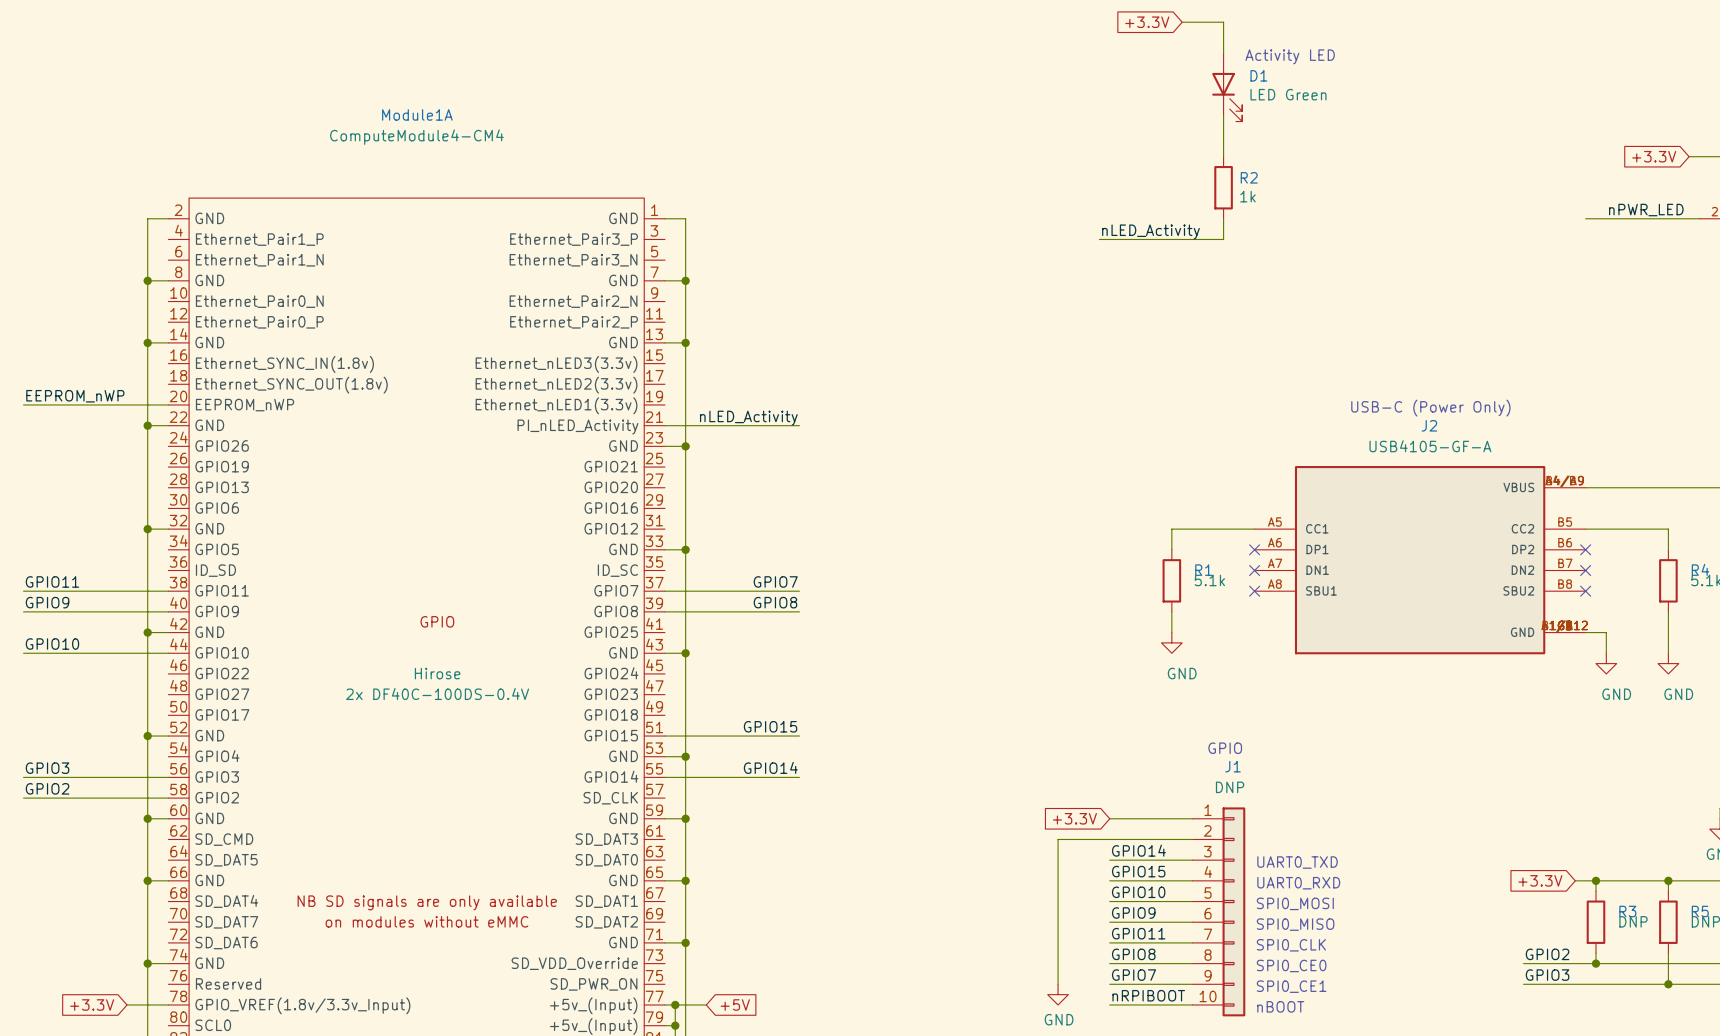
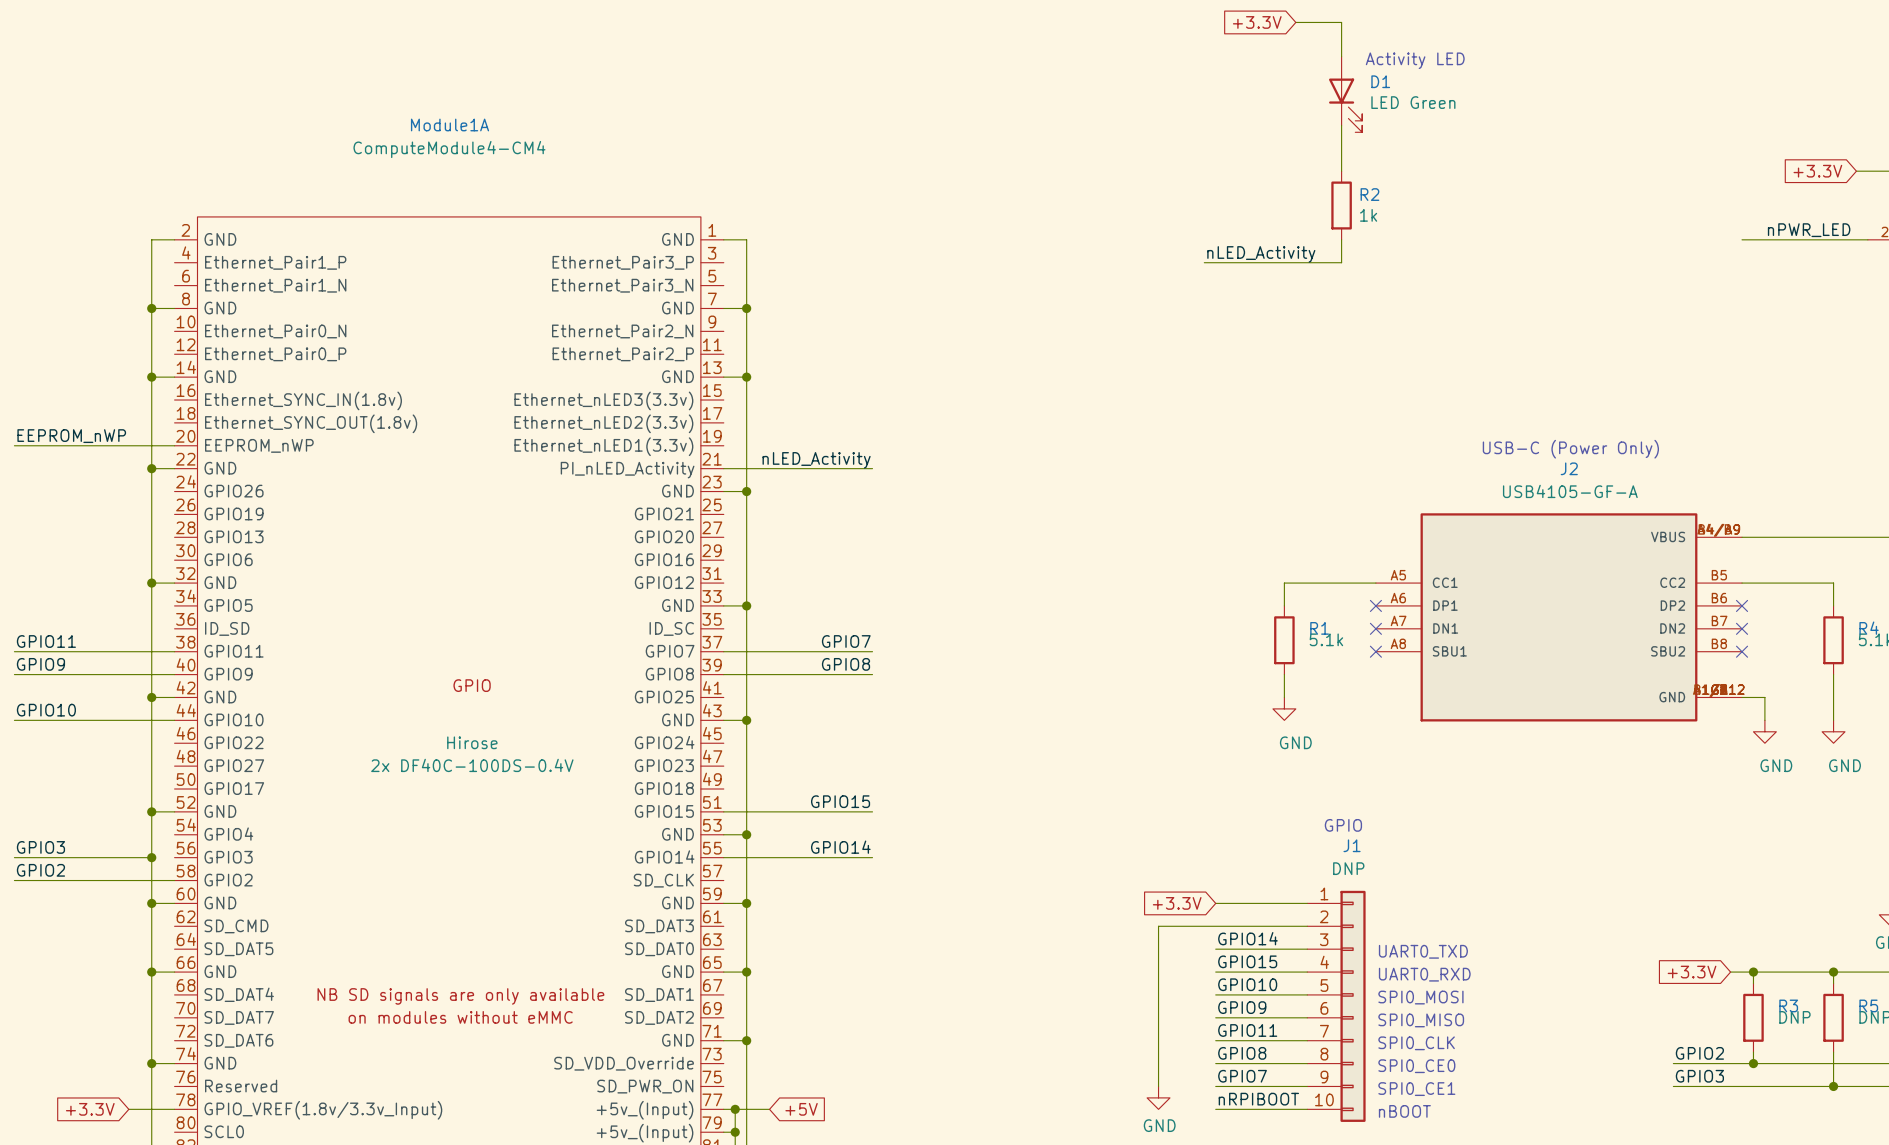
wire: (147, 777) (168, 777) -> none
junction: none -> (151, 857)

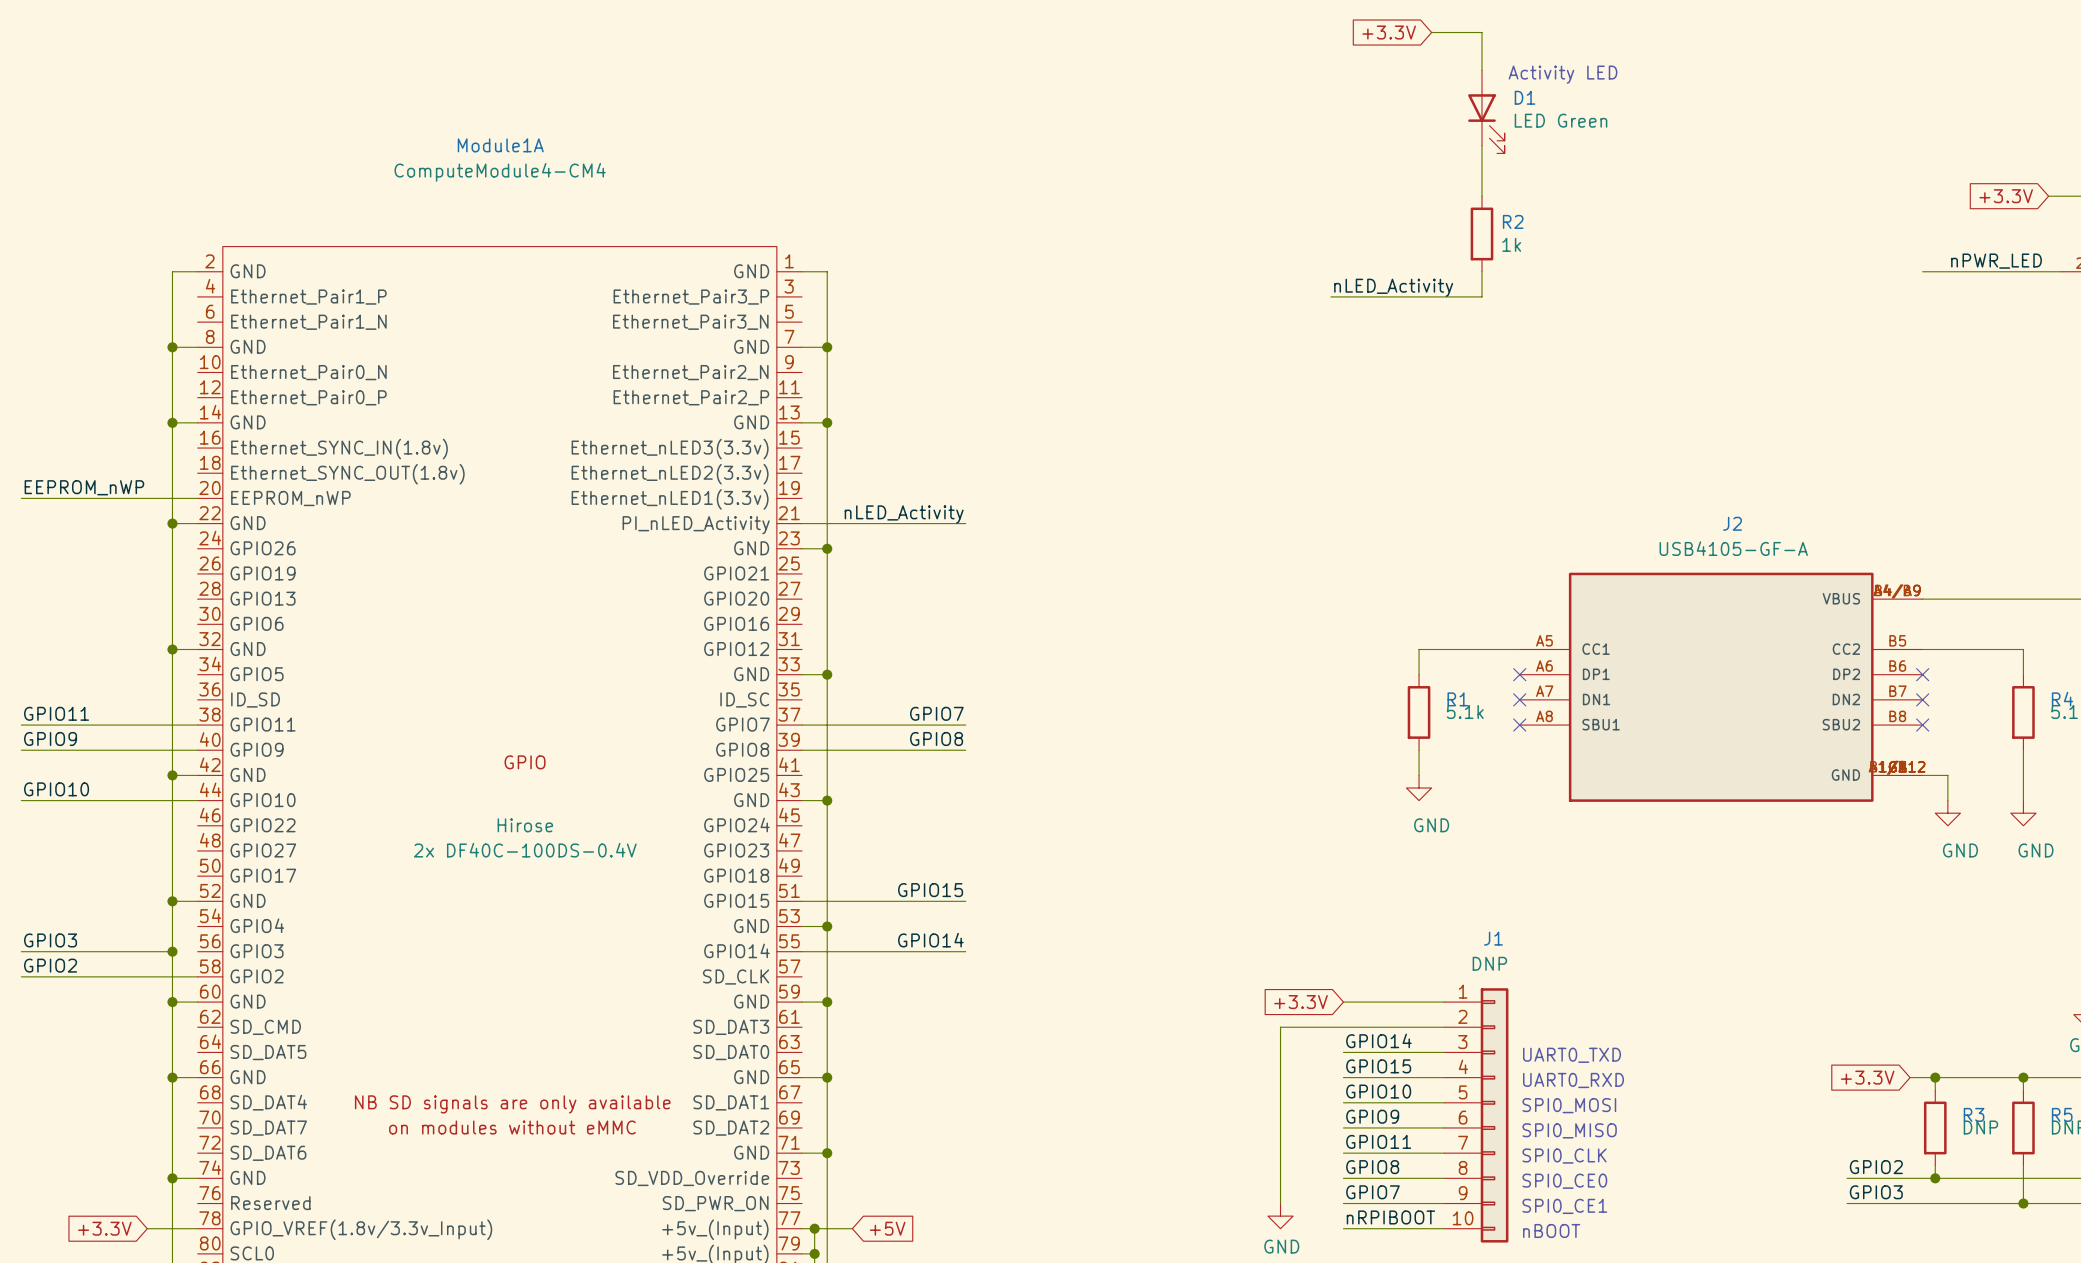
text: USB-C (Power Only) (1570, 449) -> none
text: GPIO (1343, 825) -> none

